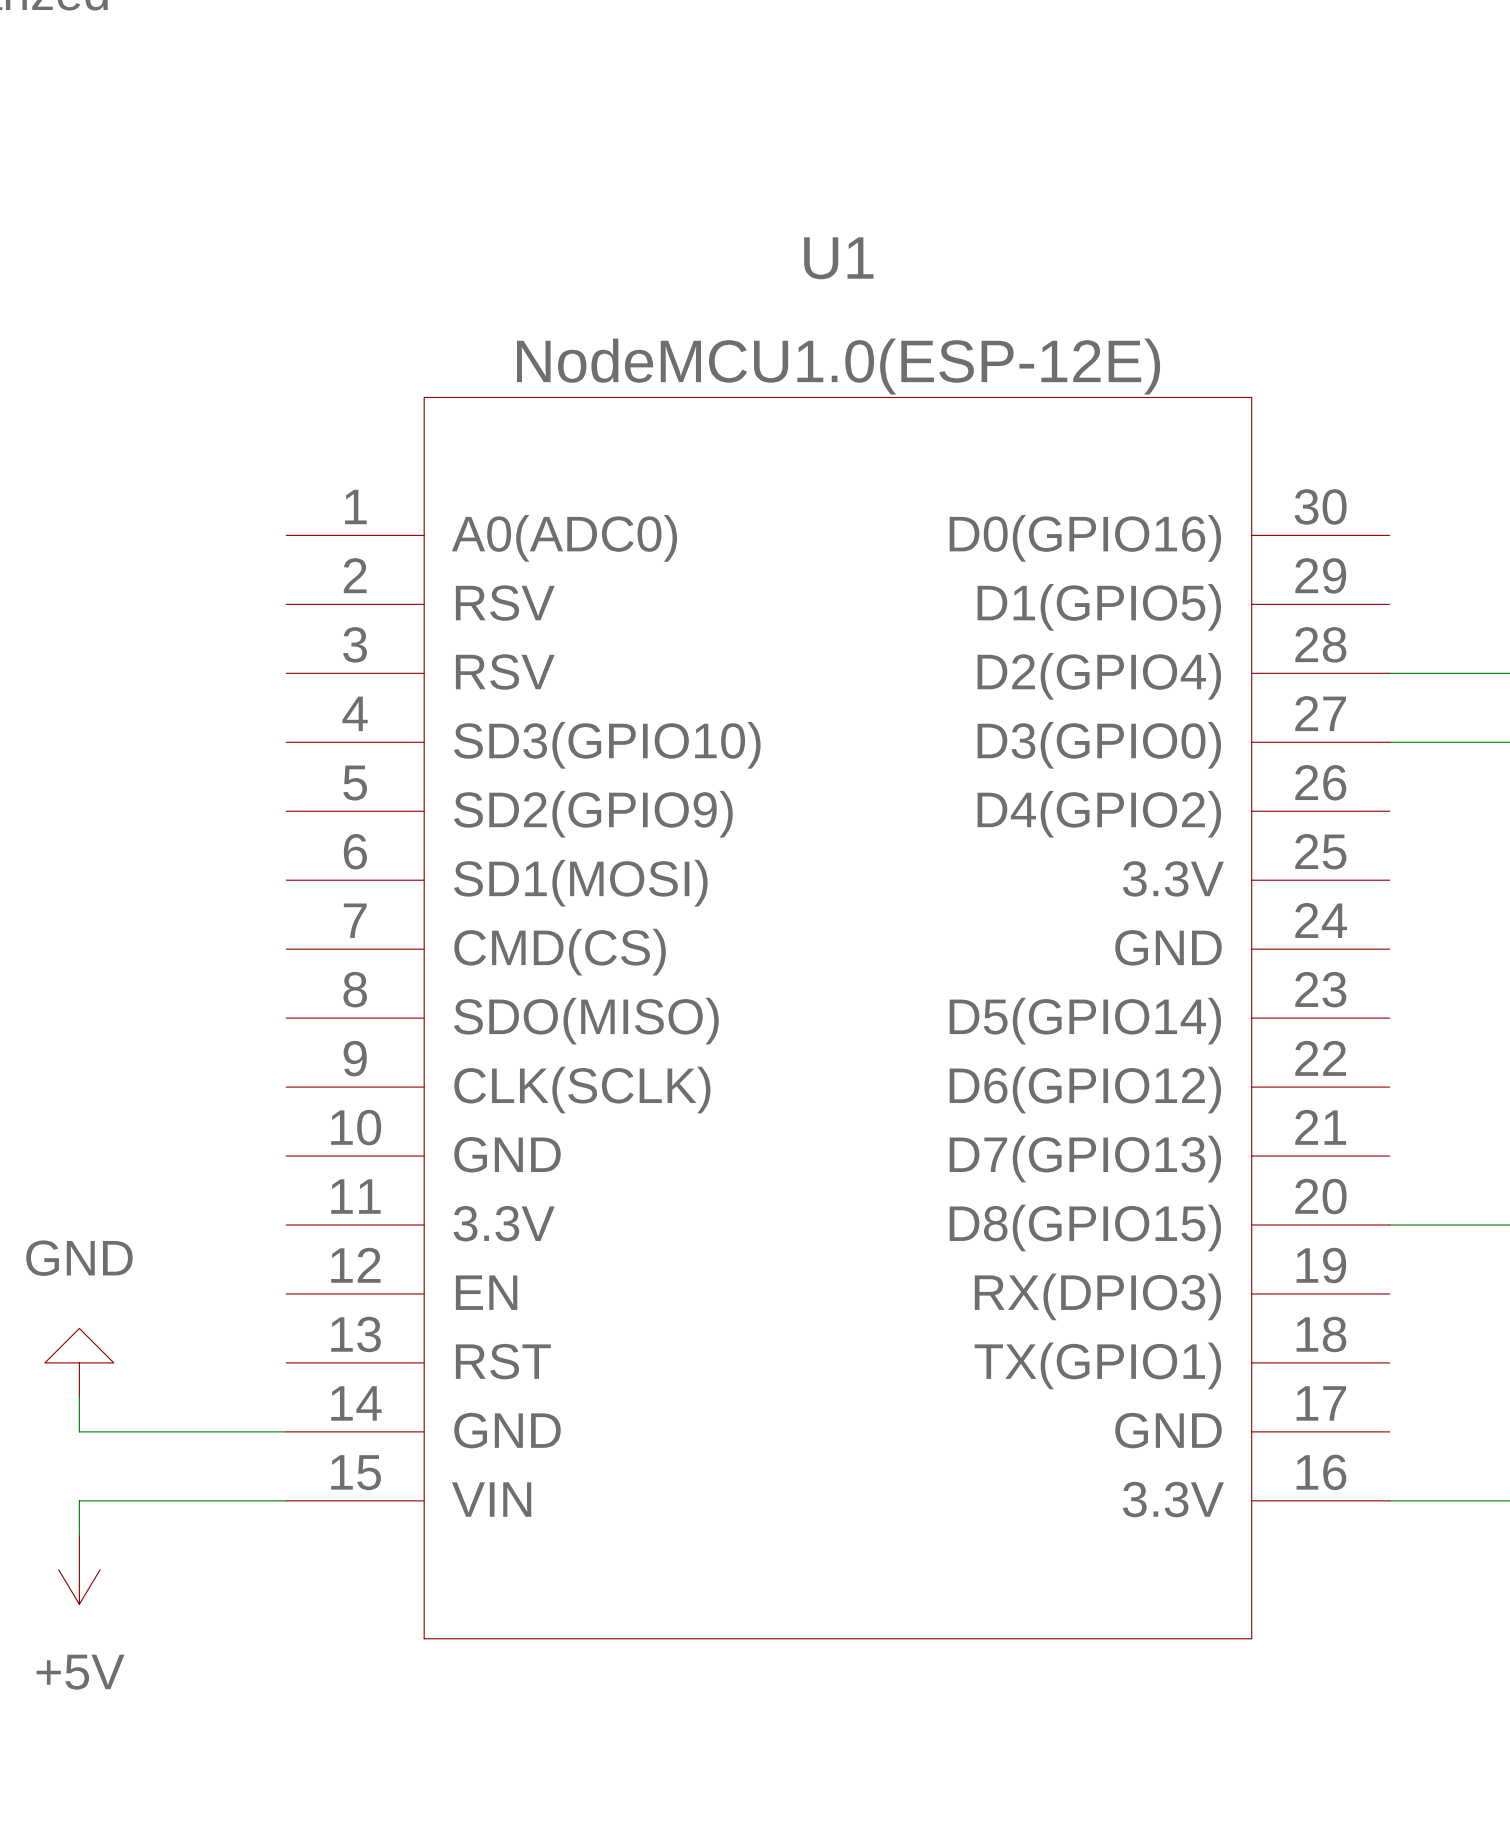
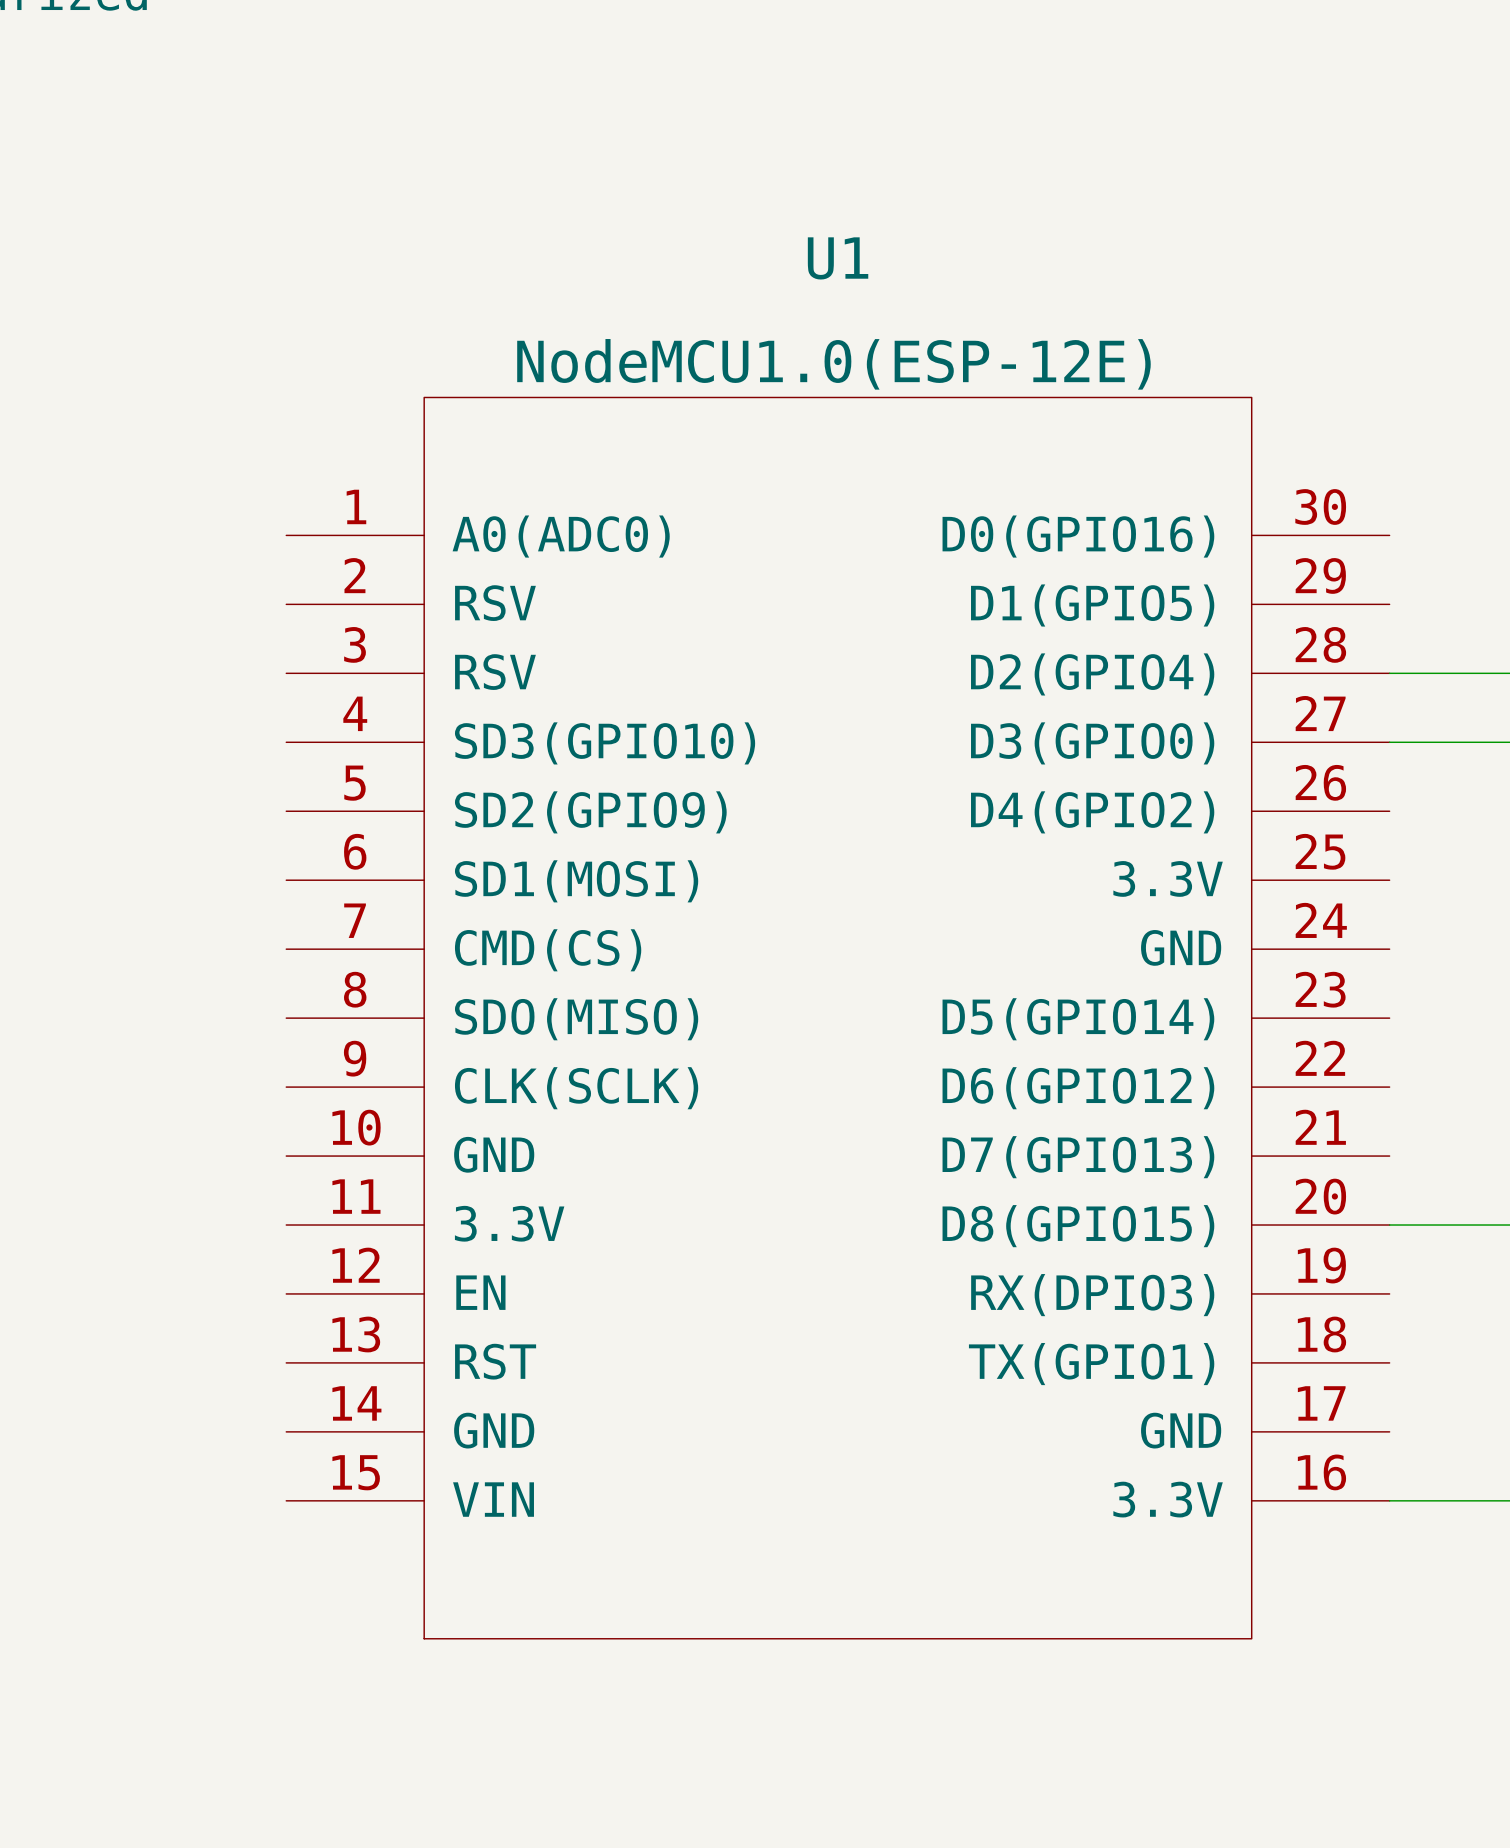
power symbol: GND (79, 1362) -> none
wire: (79, 1397) (79, 1431) (286, 1431) -> none
wire: (286, 1500) (79, 1500) (79, 1535) -> none
power symbol: +5V (79, 1569) -> none

